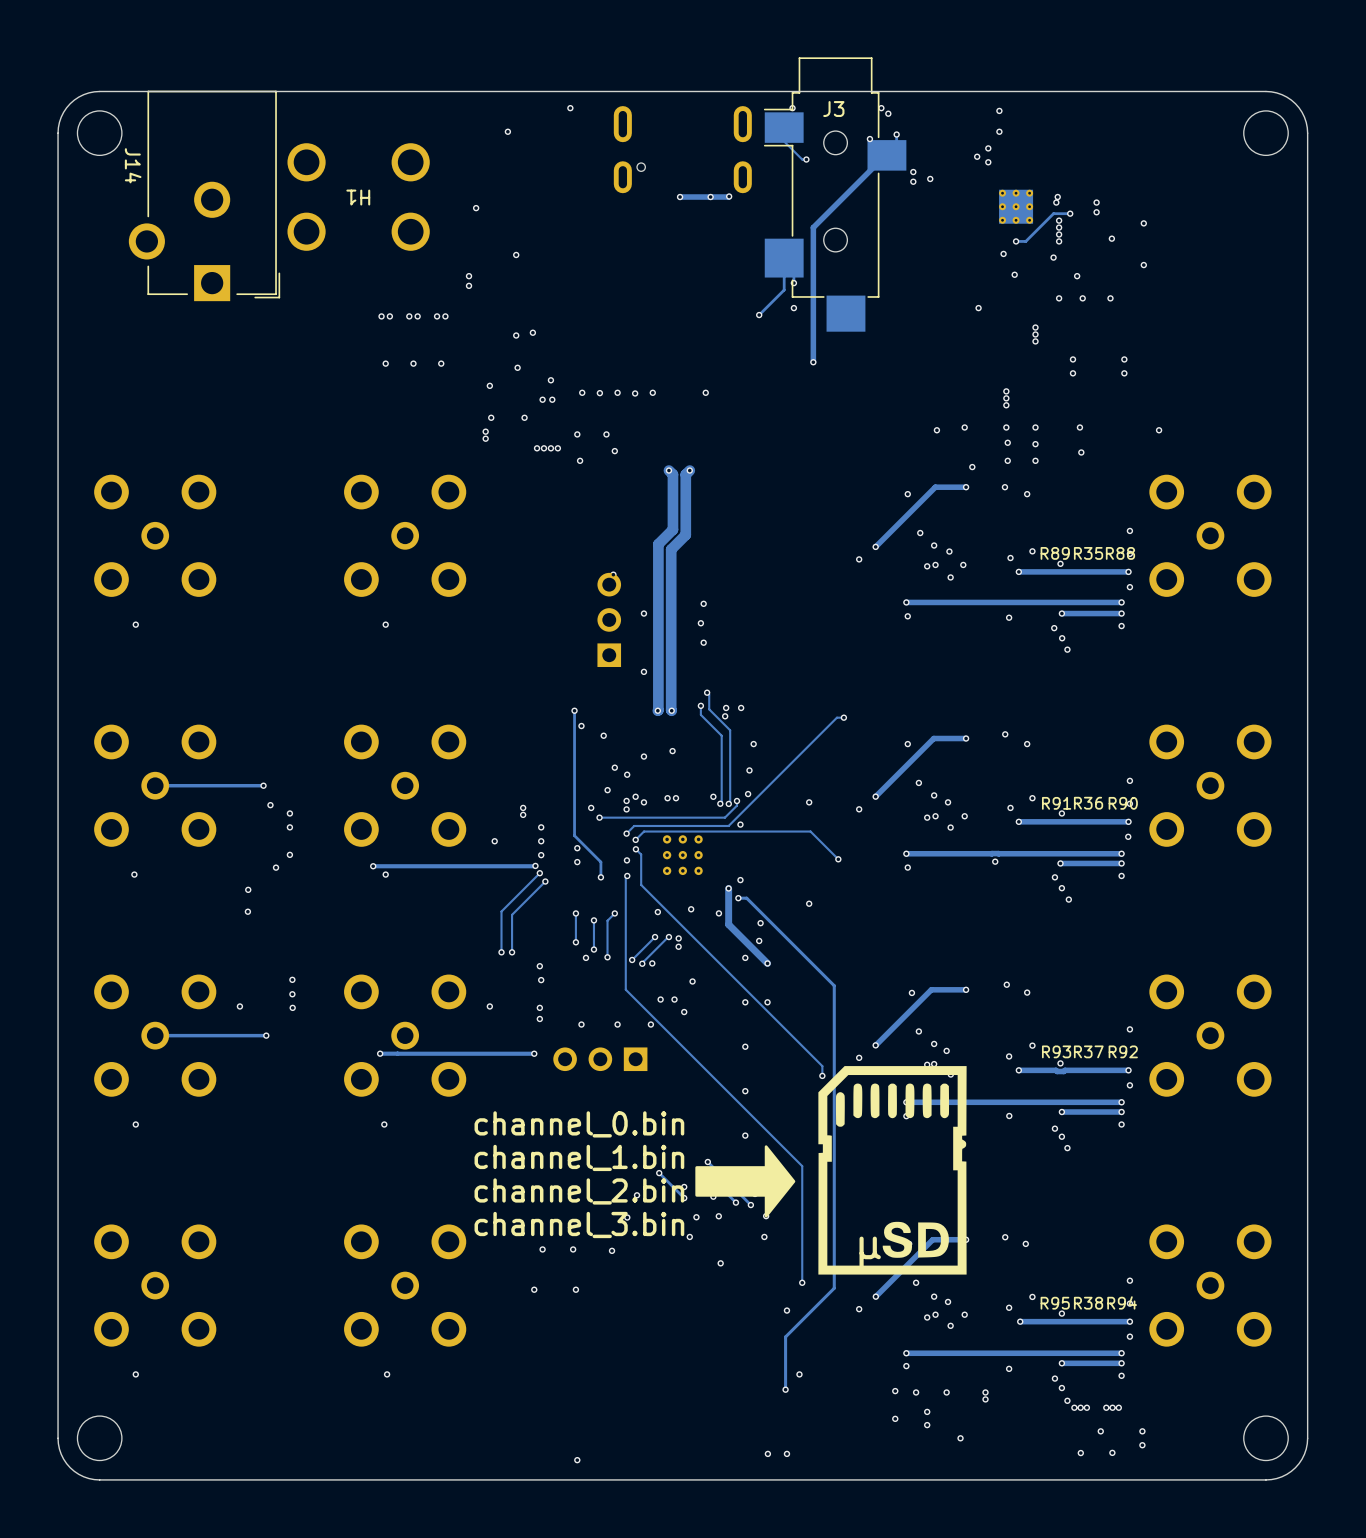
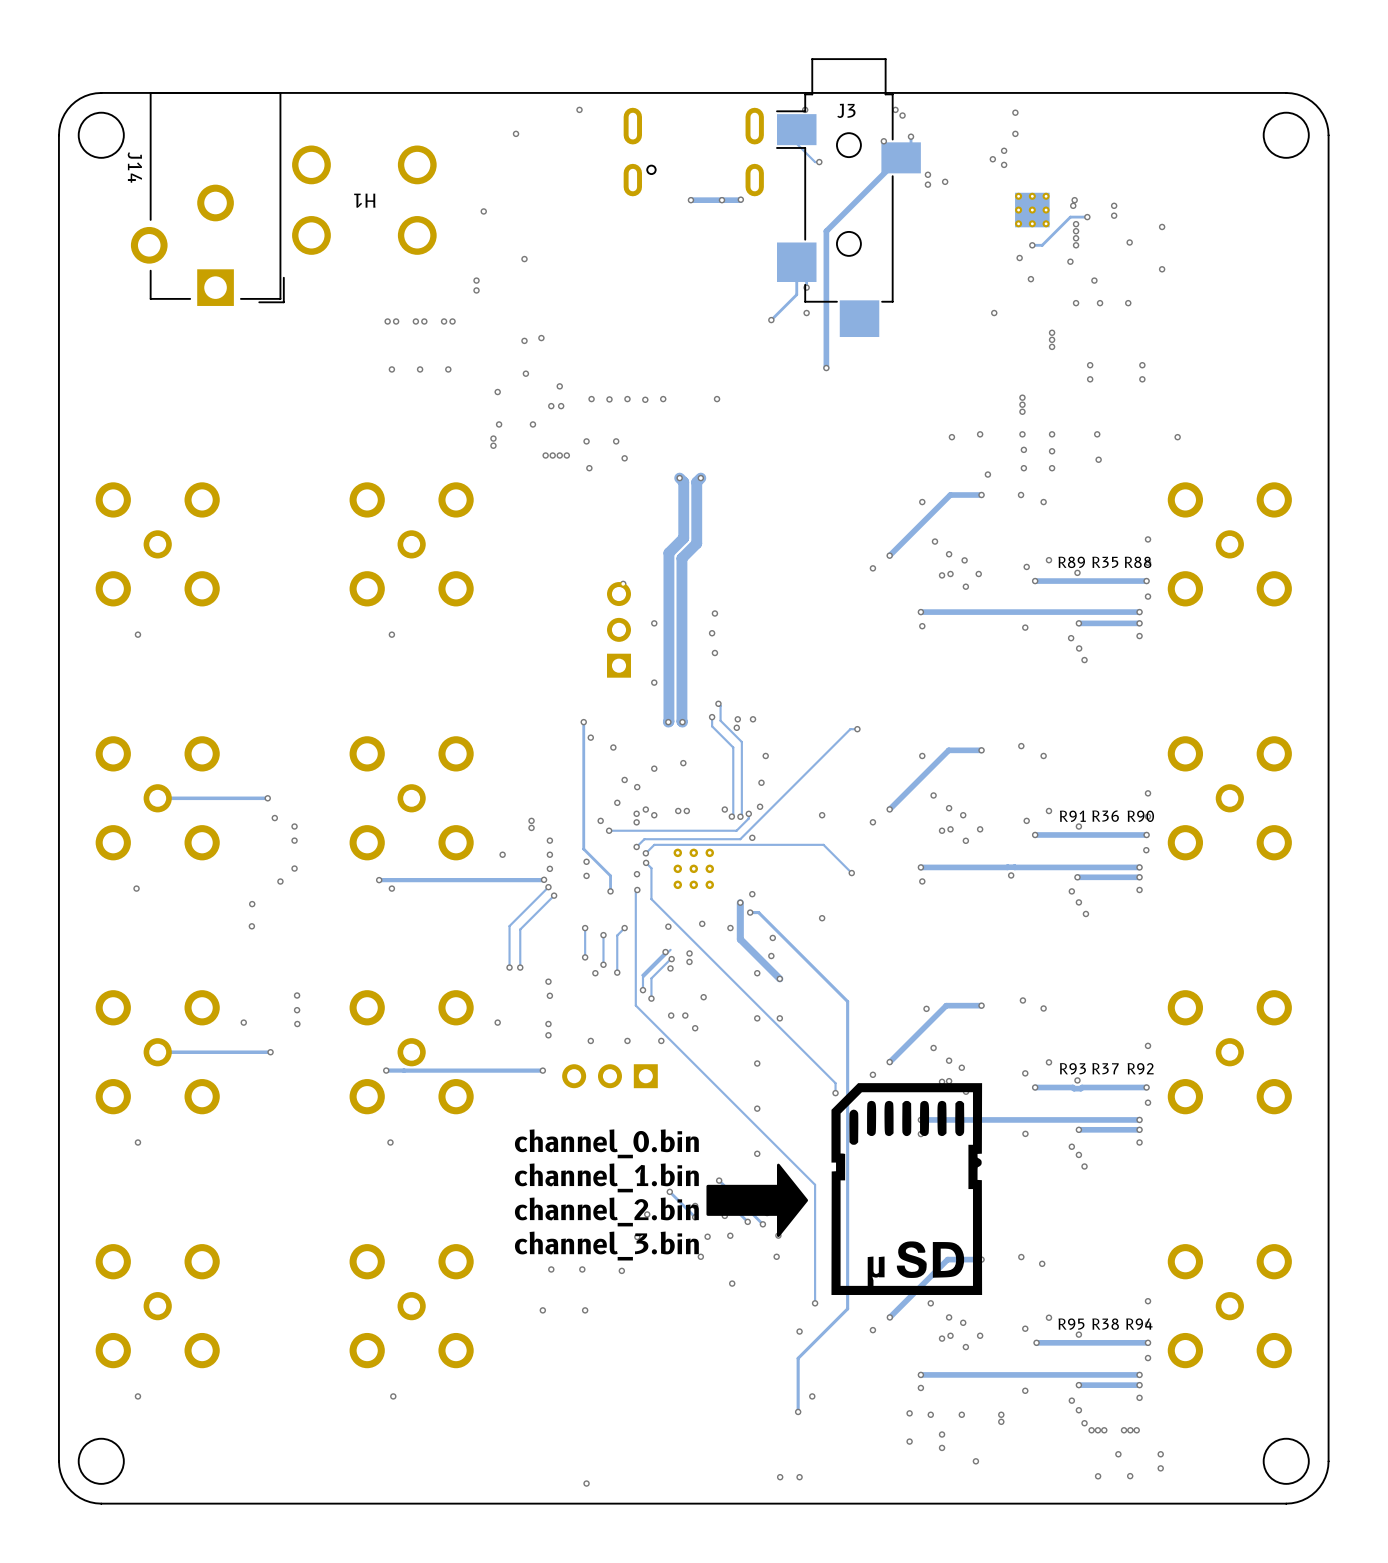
track: none -> (670, 949) (642, 977) (642, 990)
track: (668, 937) (642, 963) -> none
via: (668, 937) -> none
track: none -> (671, 959) (651, 978) (651, 998)
via: none -> (671, 959)
via: none -> (670, 968)
via: (632, 959) -> none
via: (642, 963) -> none
via: (652, 963) -> none
via: none -> (642, 990)
via: none -> (651, 998)

